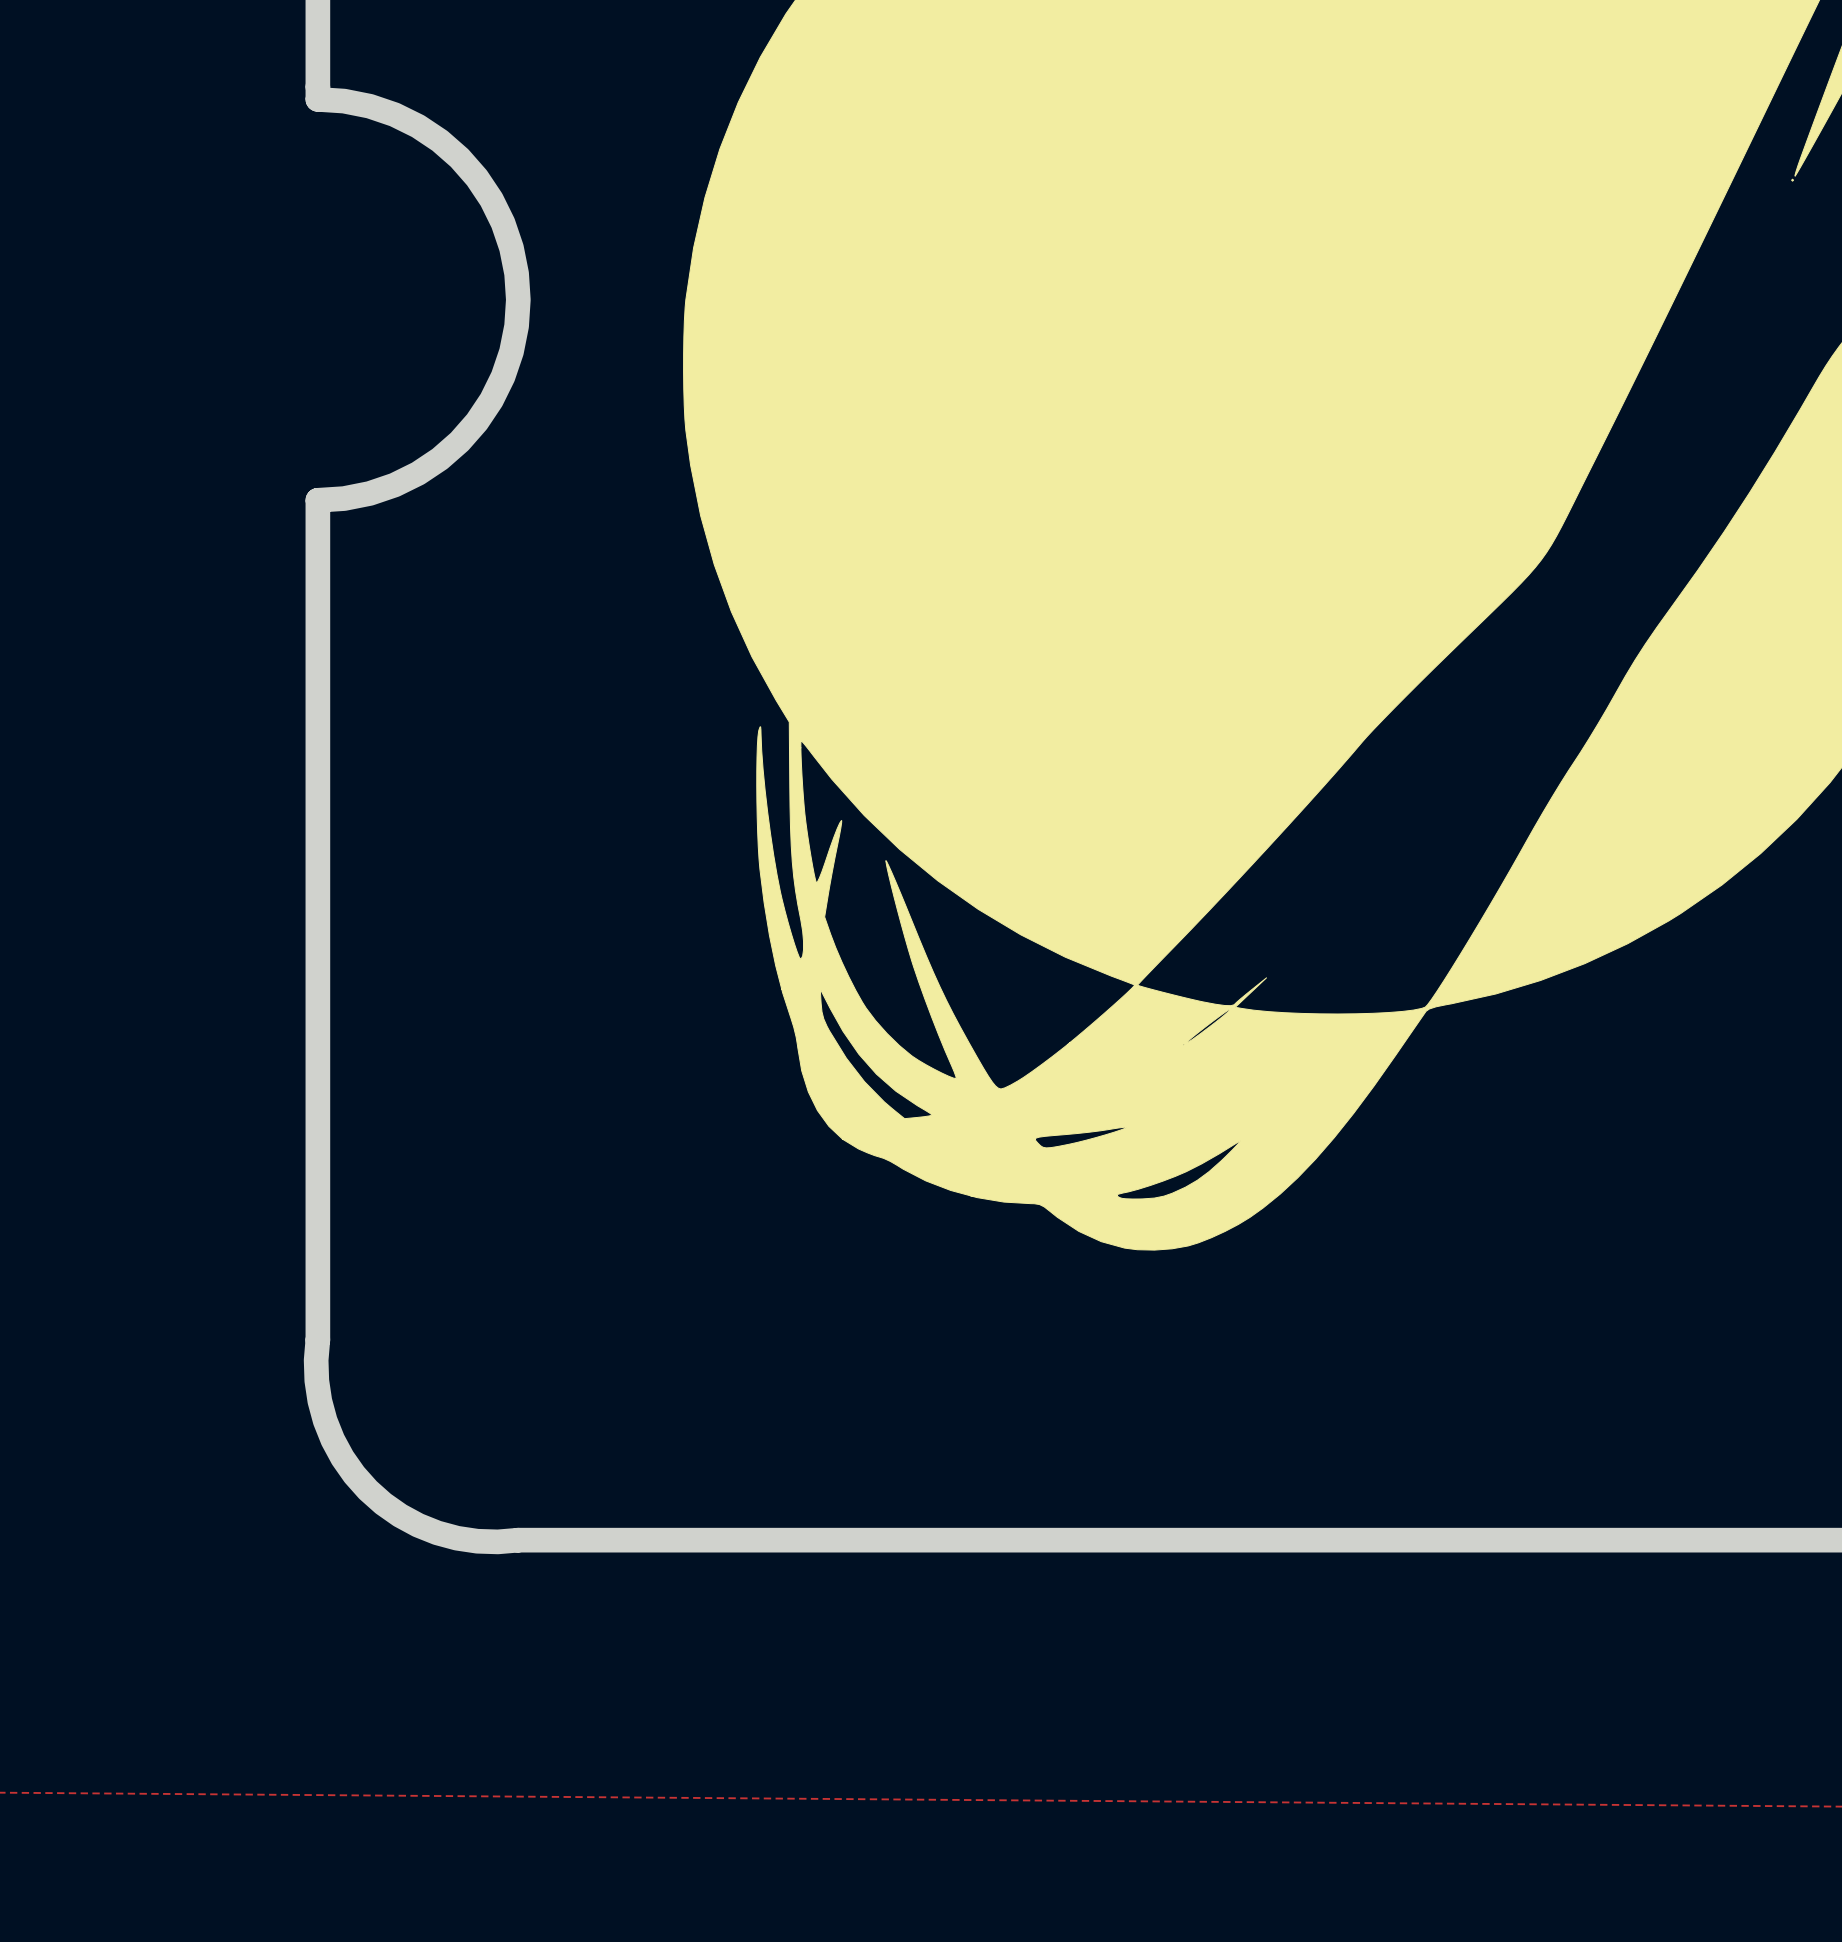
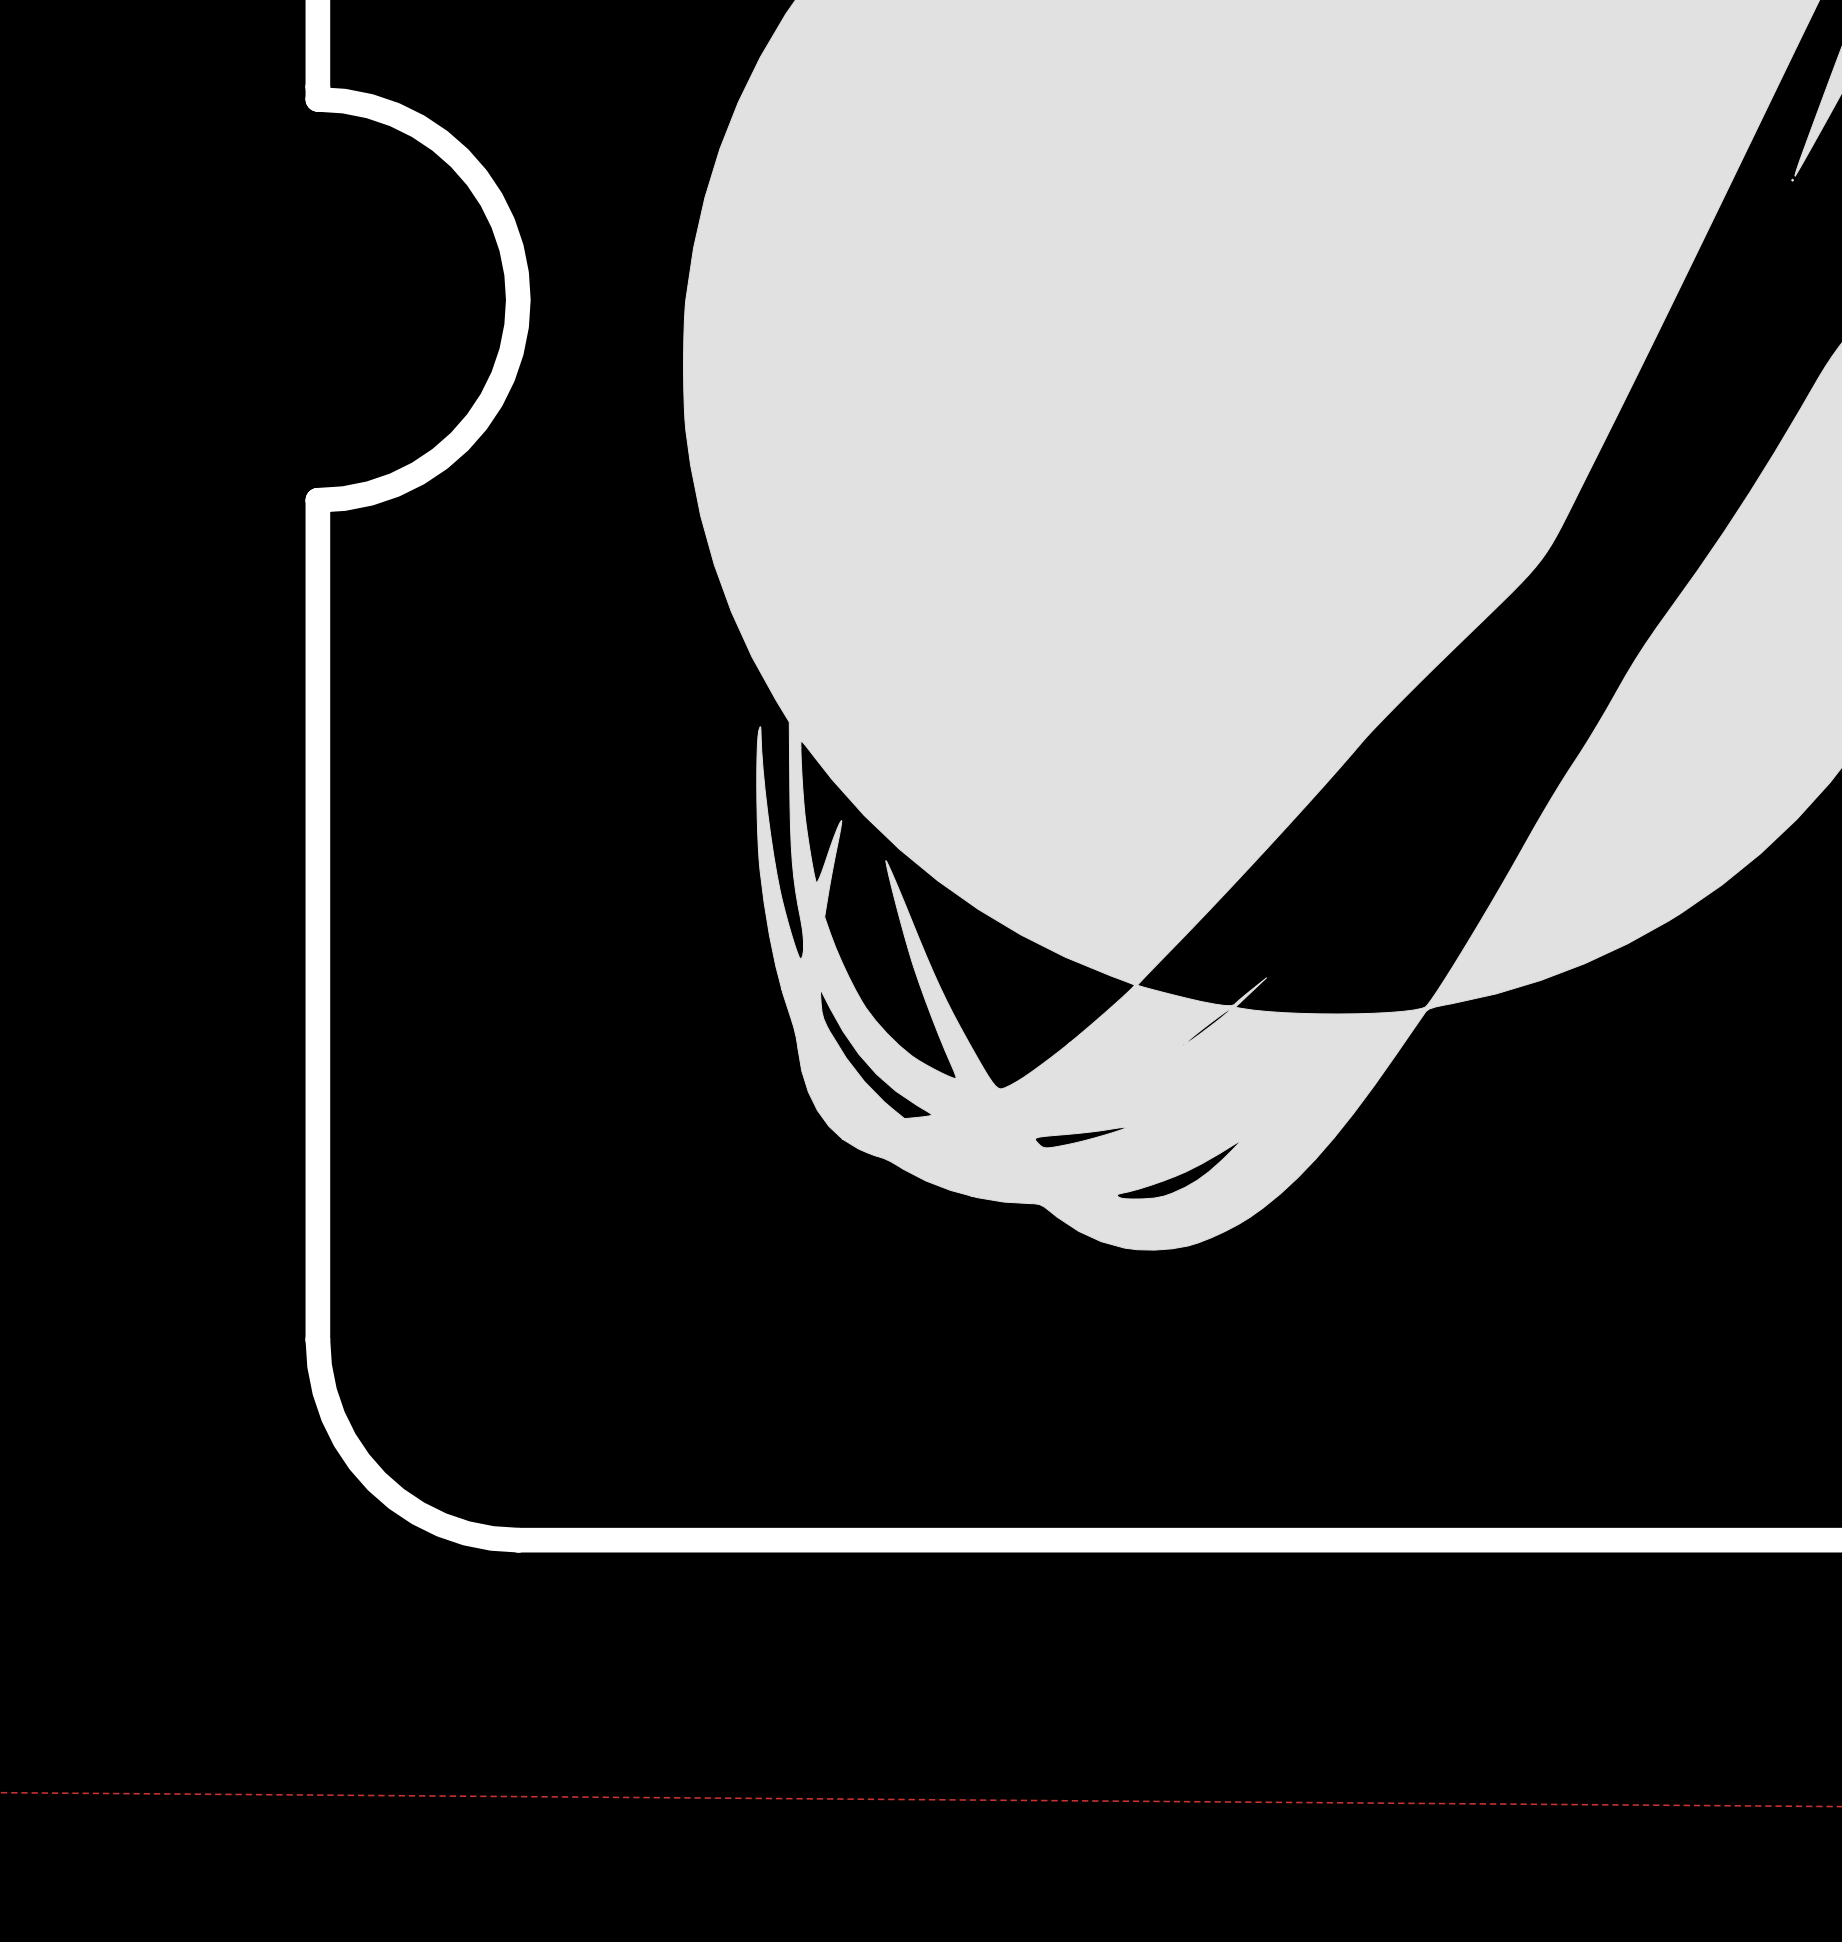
board edge: (317, 1339) (316, 1380) (325, 1420) (342, 1457) (367, 1490) (400, 1515) (437, 1532) (477, 1541) (518, 1540) -> (317, 1339) (319, 1365) (324, 1391) (333, 1416) (344, 1439) (359, 1461) (376, 1481) (396, 1498) (418, 1513) (441, 1524) (466, 1533) (492, 1538) (518, 1540)

